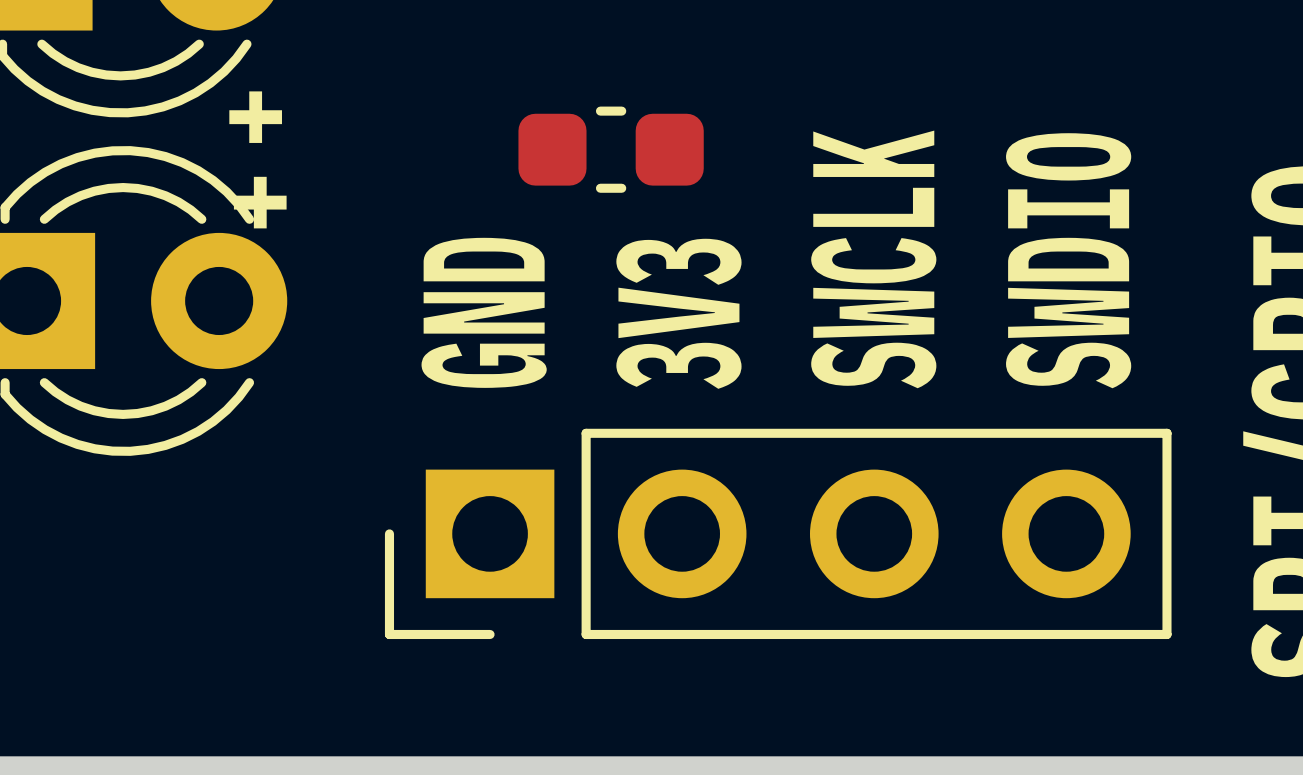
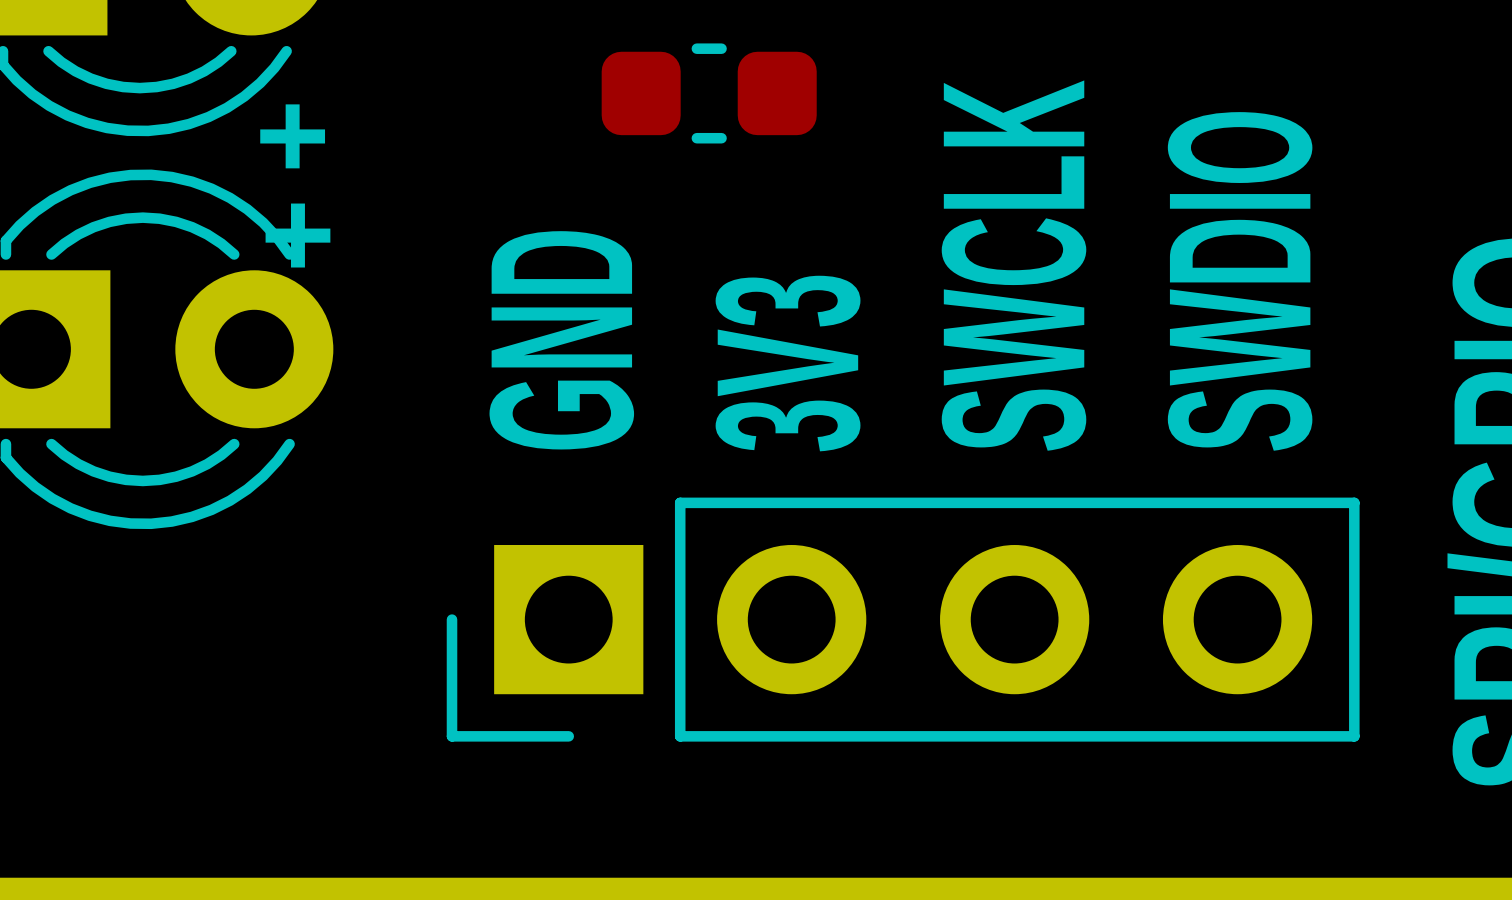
part position: (611, 149) -> (709, 93)

